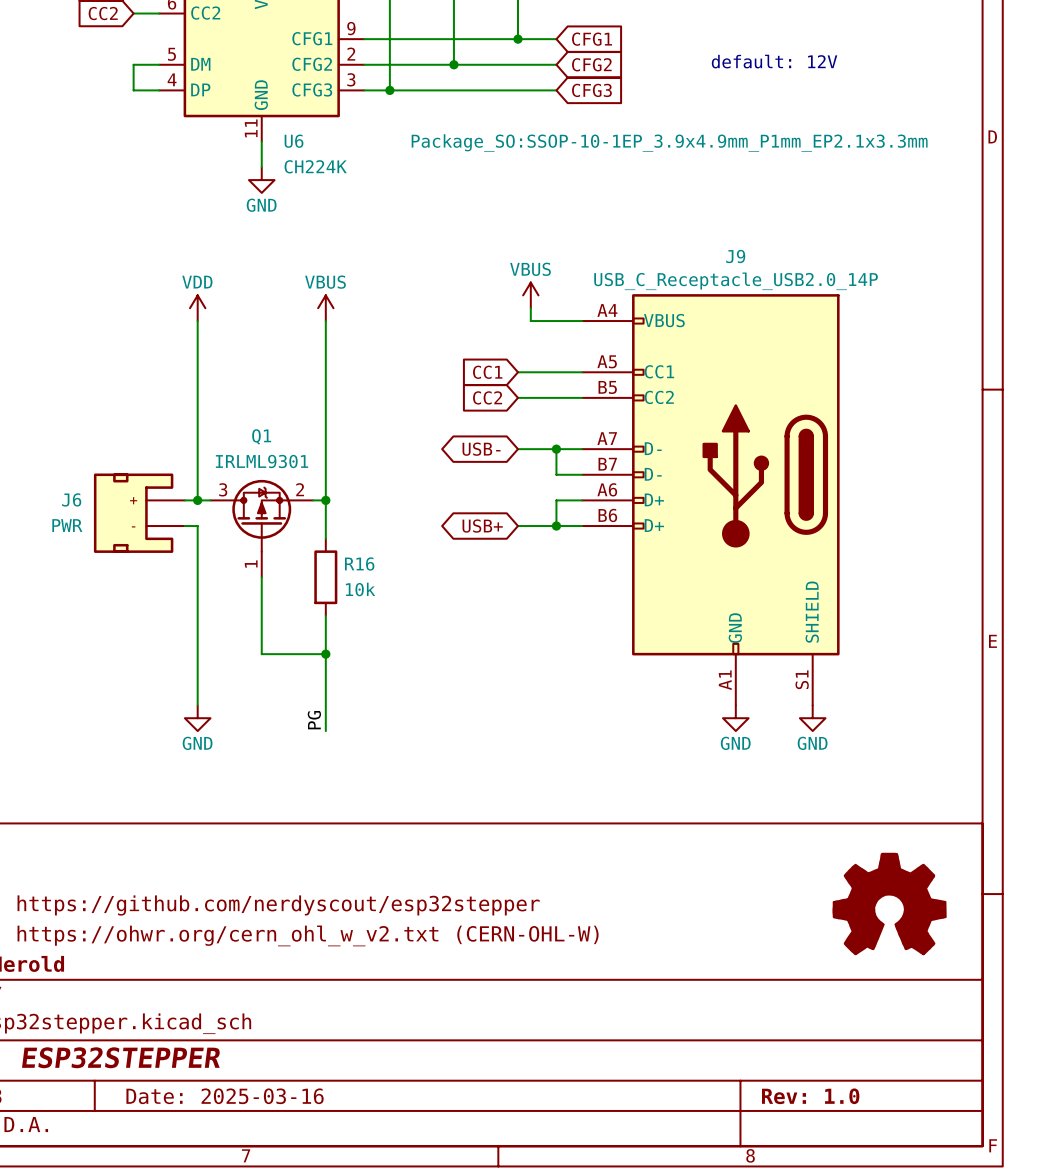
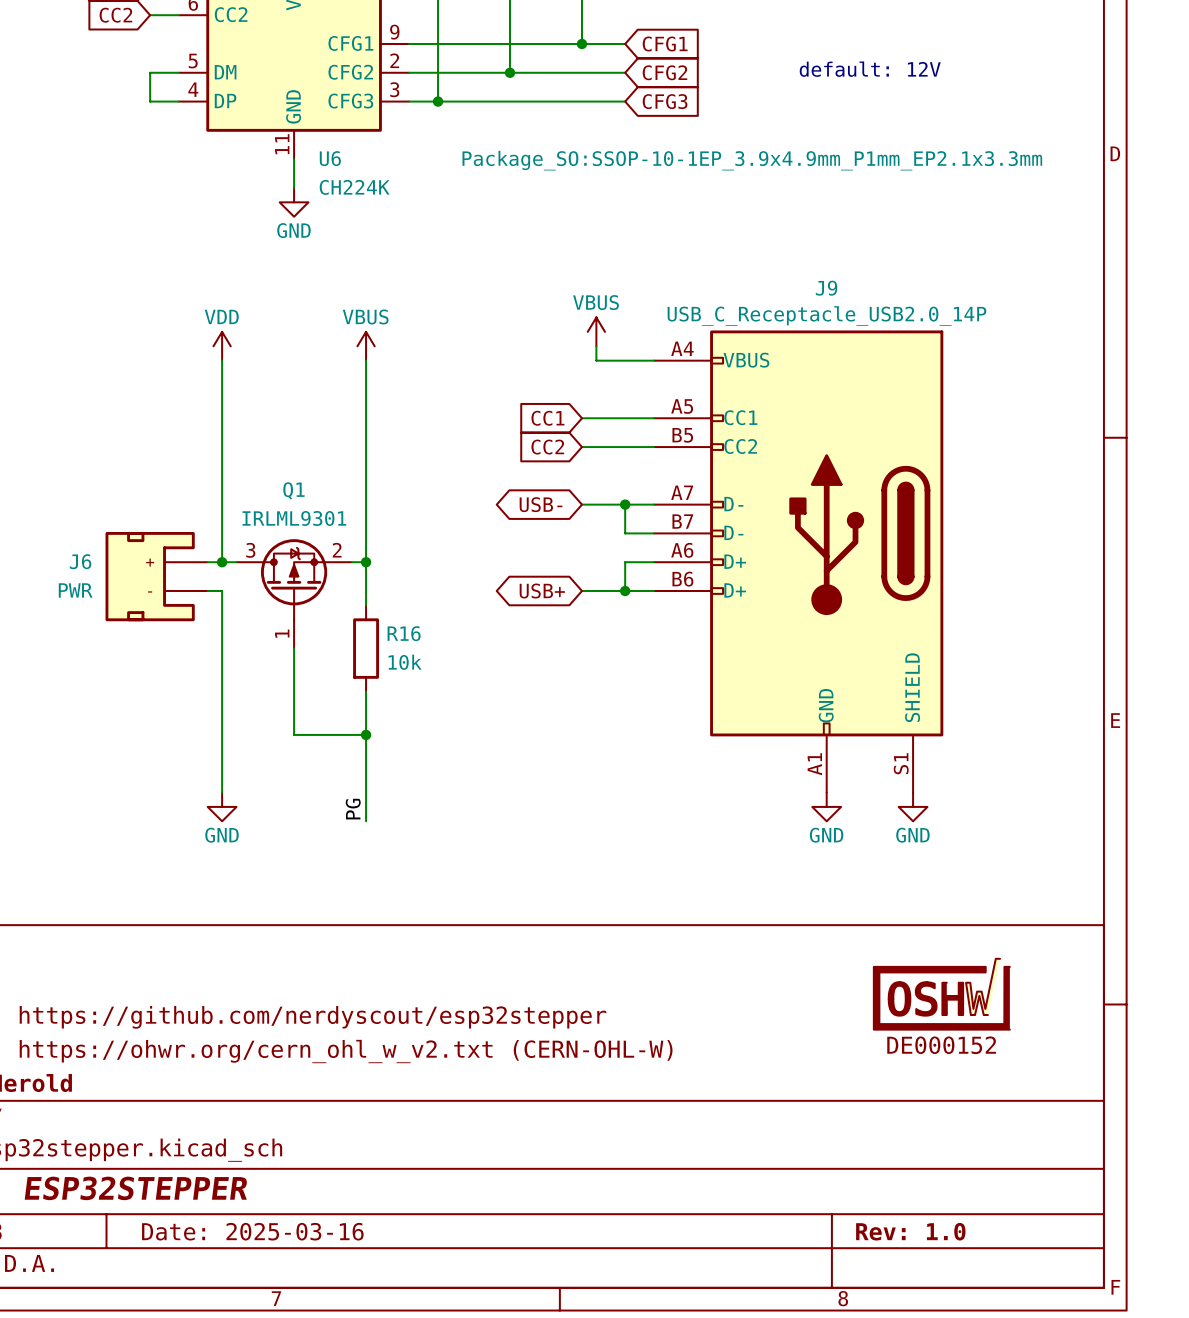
part: none -> (941, 994)
power symbol: (889, 903) -> none

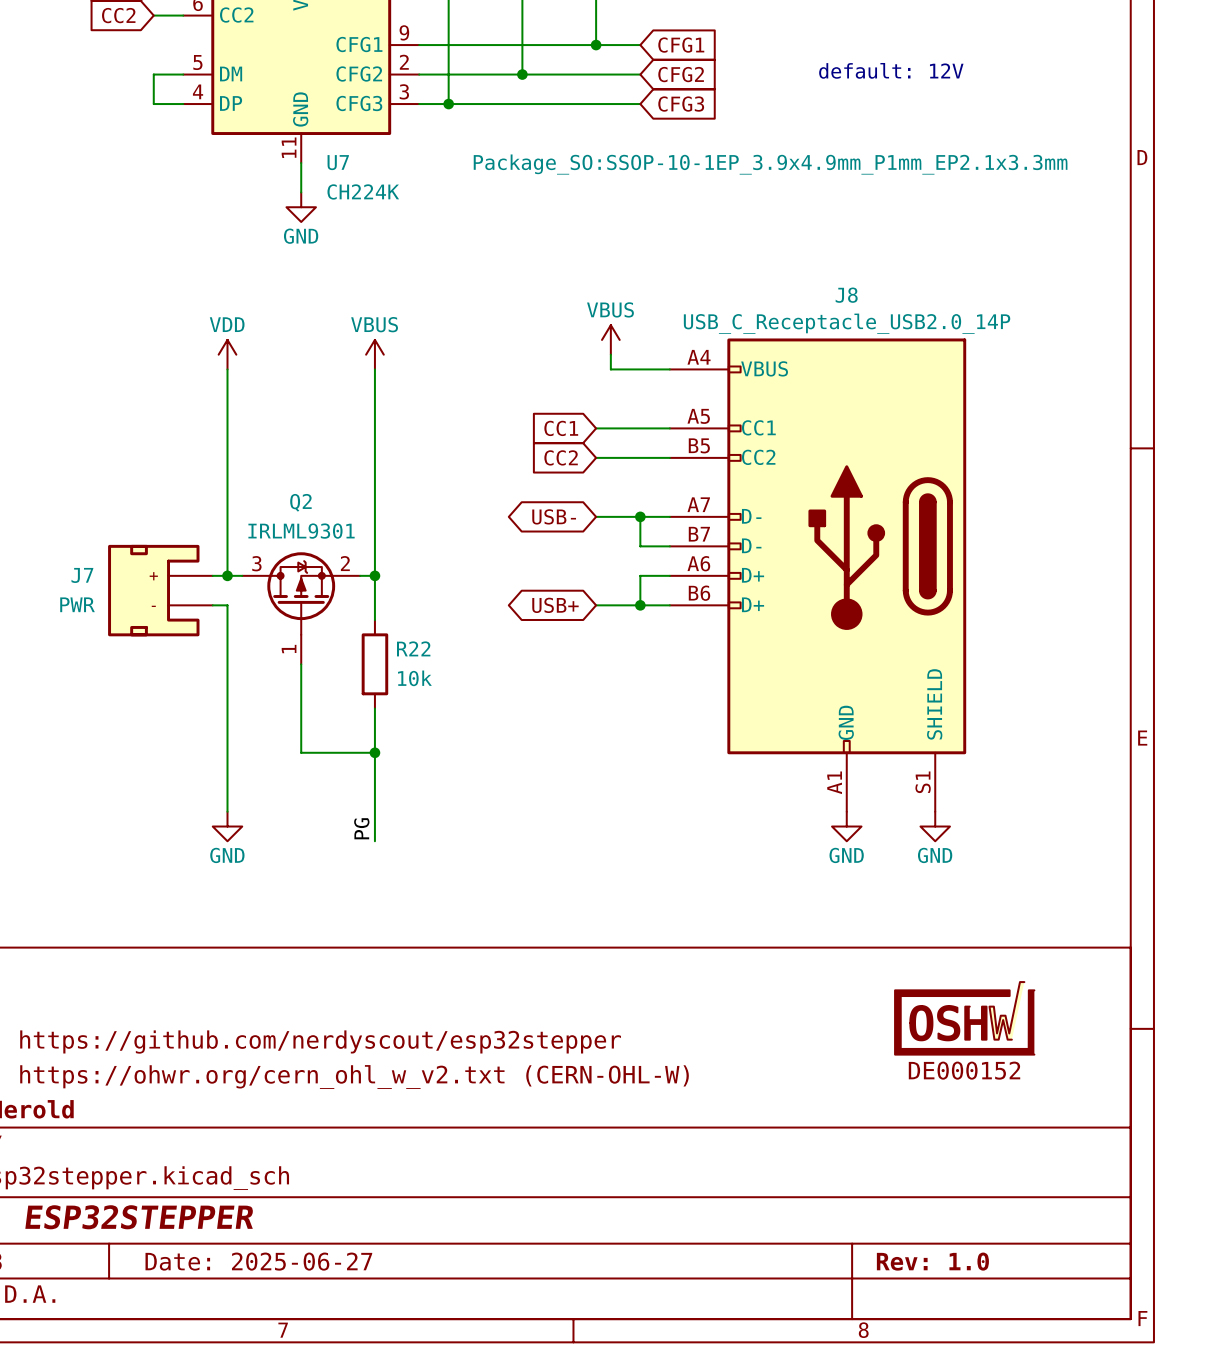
U6 name: U6 (330, 158) -> U7 (338, 162)
J9 name: J9 (826, 288) -> J8 (846, 295)
Q1 name: Q1 (293, 490) -> Q2 (300, 502)
J6 name: J6 (80, 561) -> J7 (82, 575)
R16 name: R16 (404, 633) -> R22 (413, 648)
title block: Date: 2025-03-16 (252, 1231) -> Date: 2025-06-27 (258, 1261)

